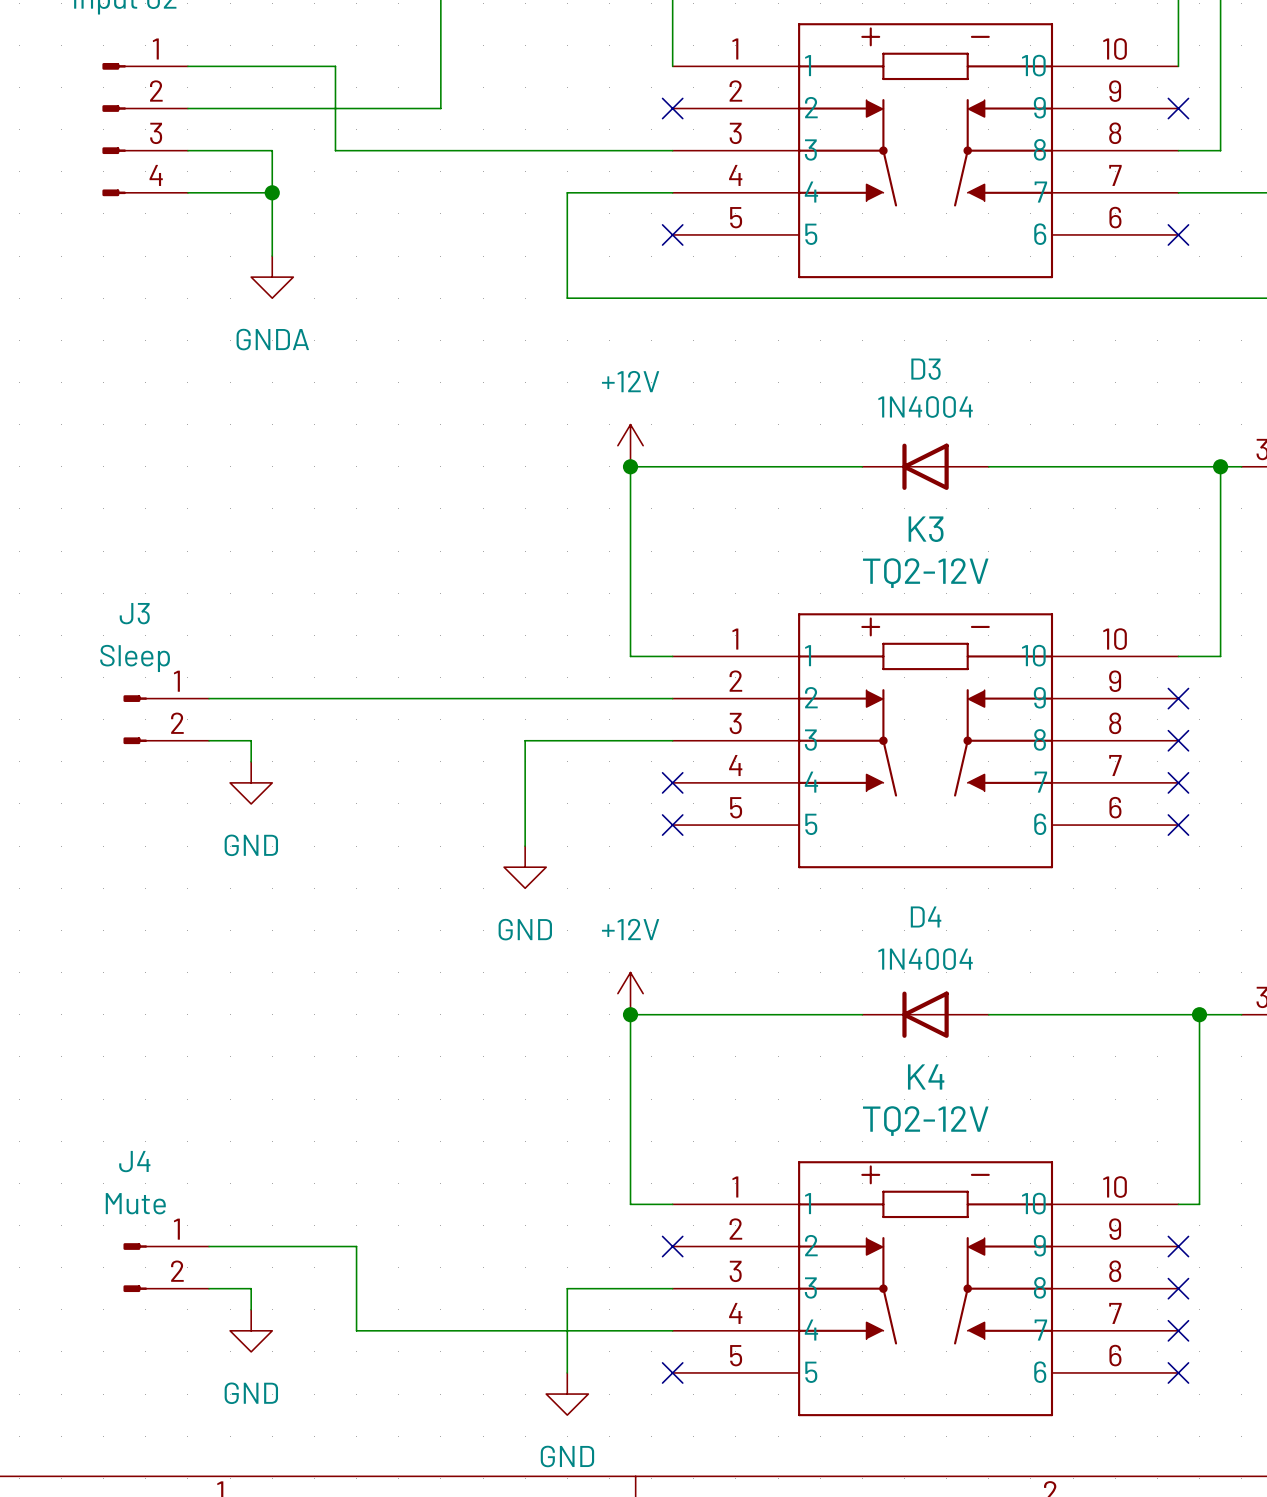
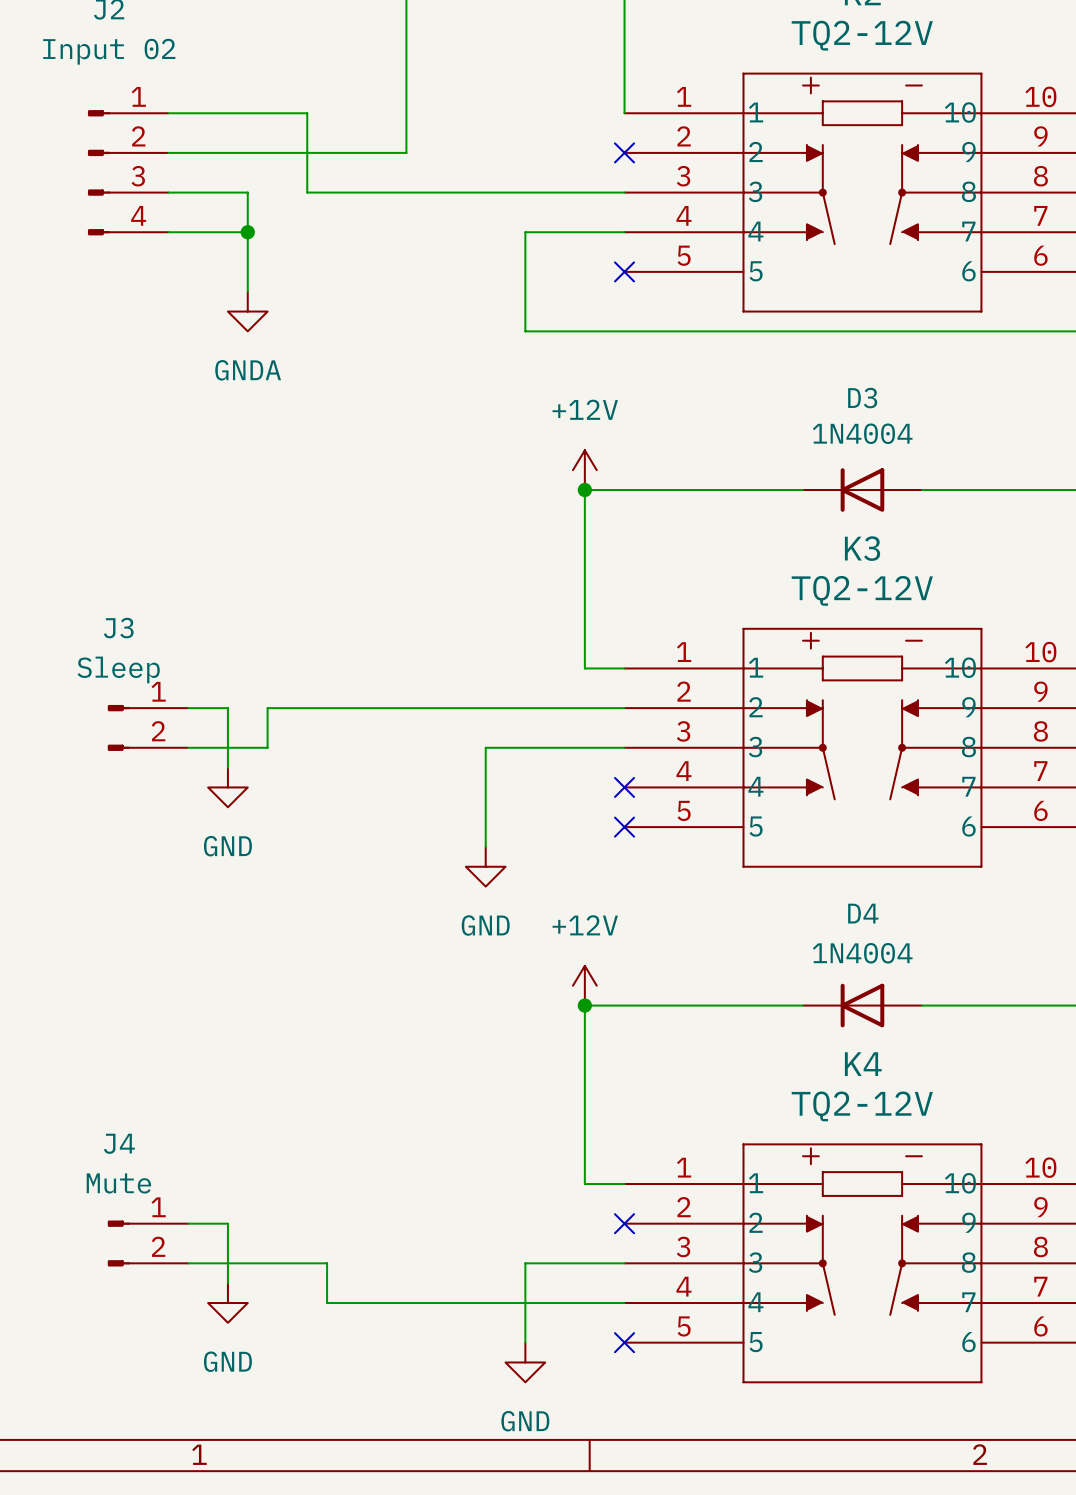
wire: (251, 698) (293, 698) -> (227, 708) (227, 747) (267, 747) (267, 708)
wire: (251, 1246) (356, 1246) (356, 1288) -> (227, 1223) (227, 1263) (327, 1263)

